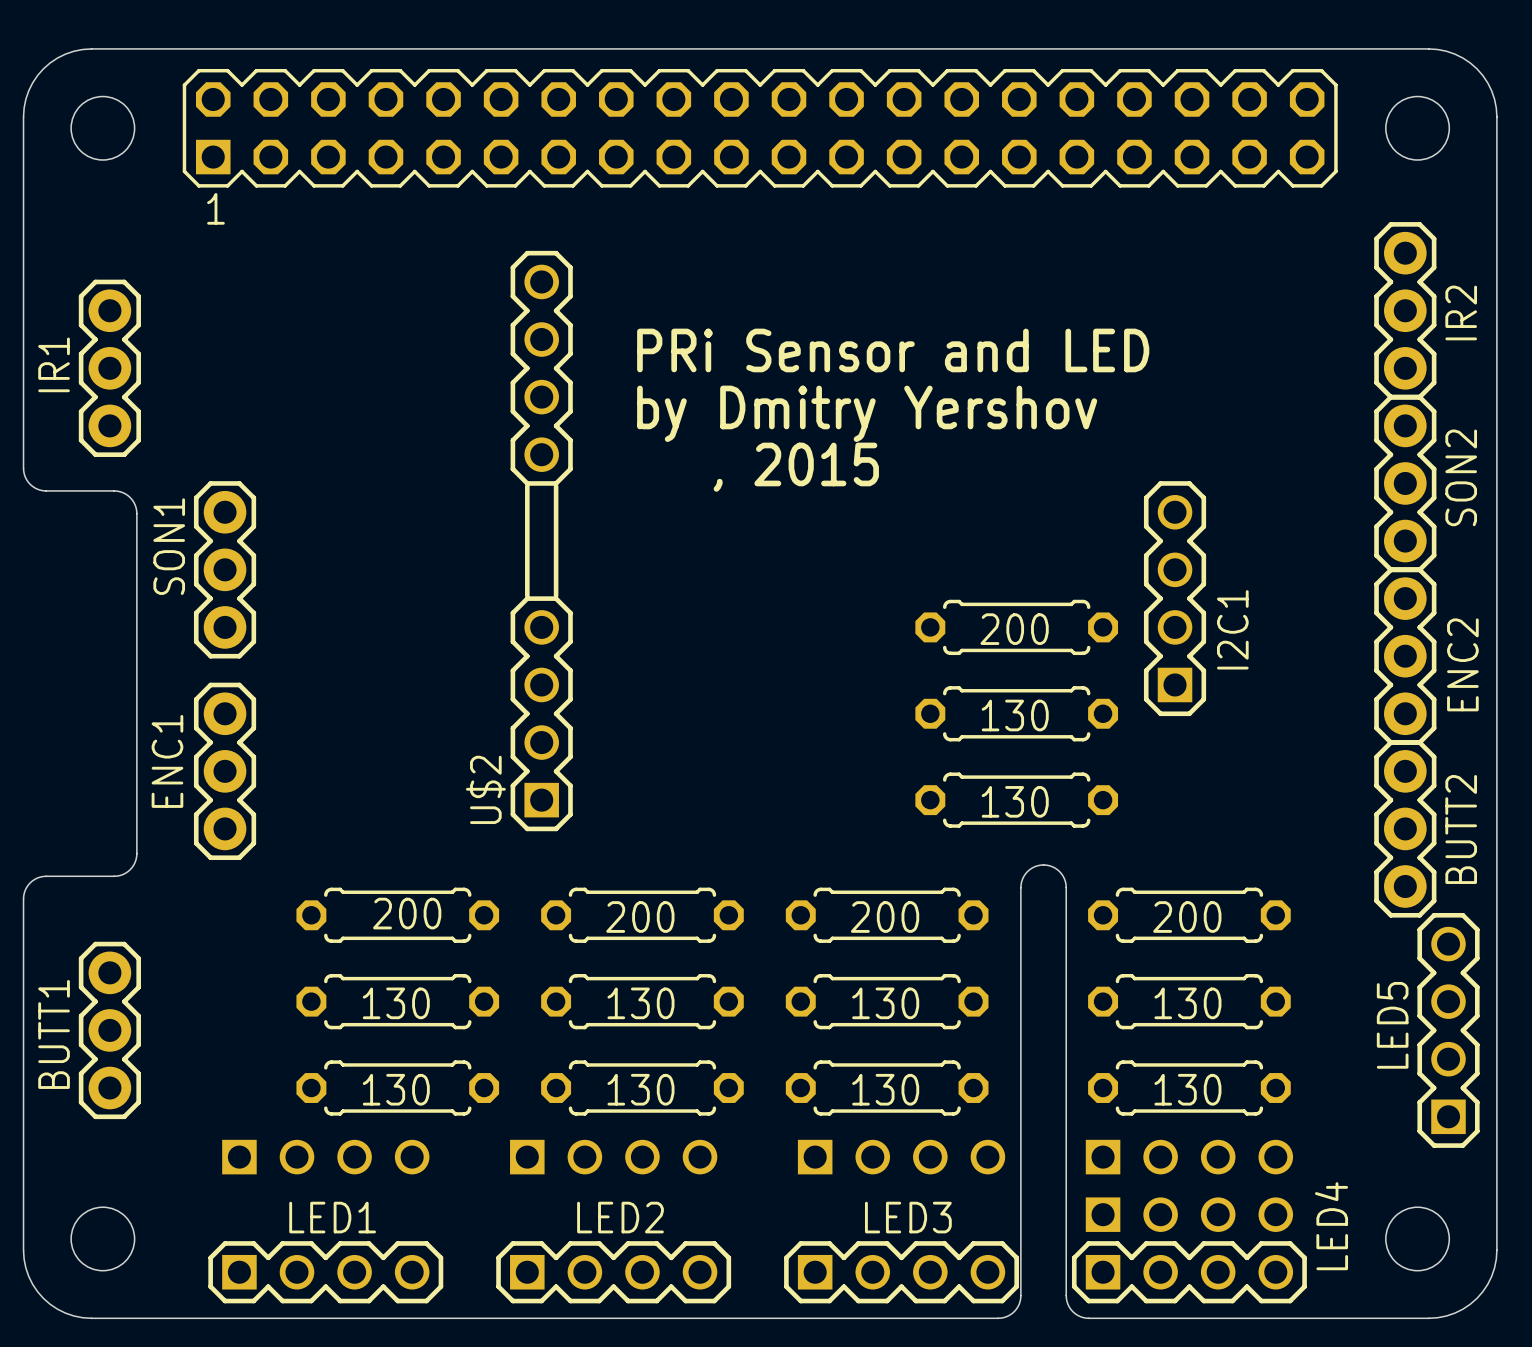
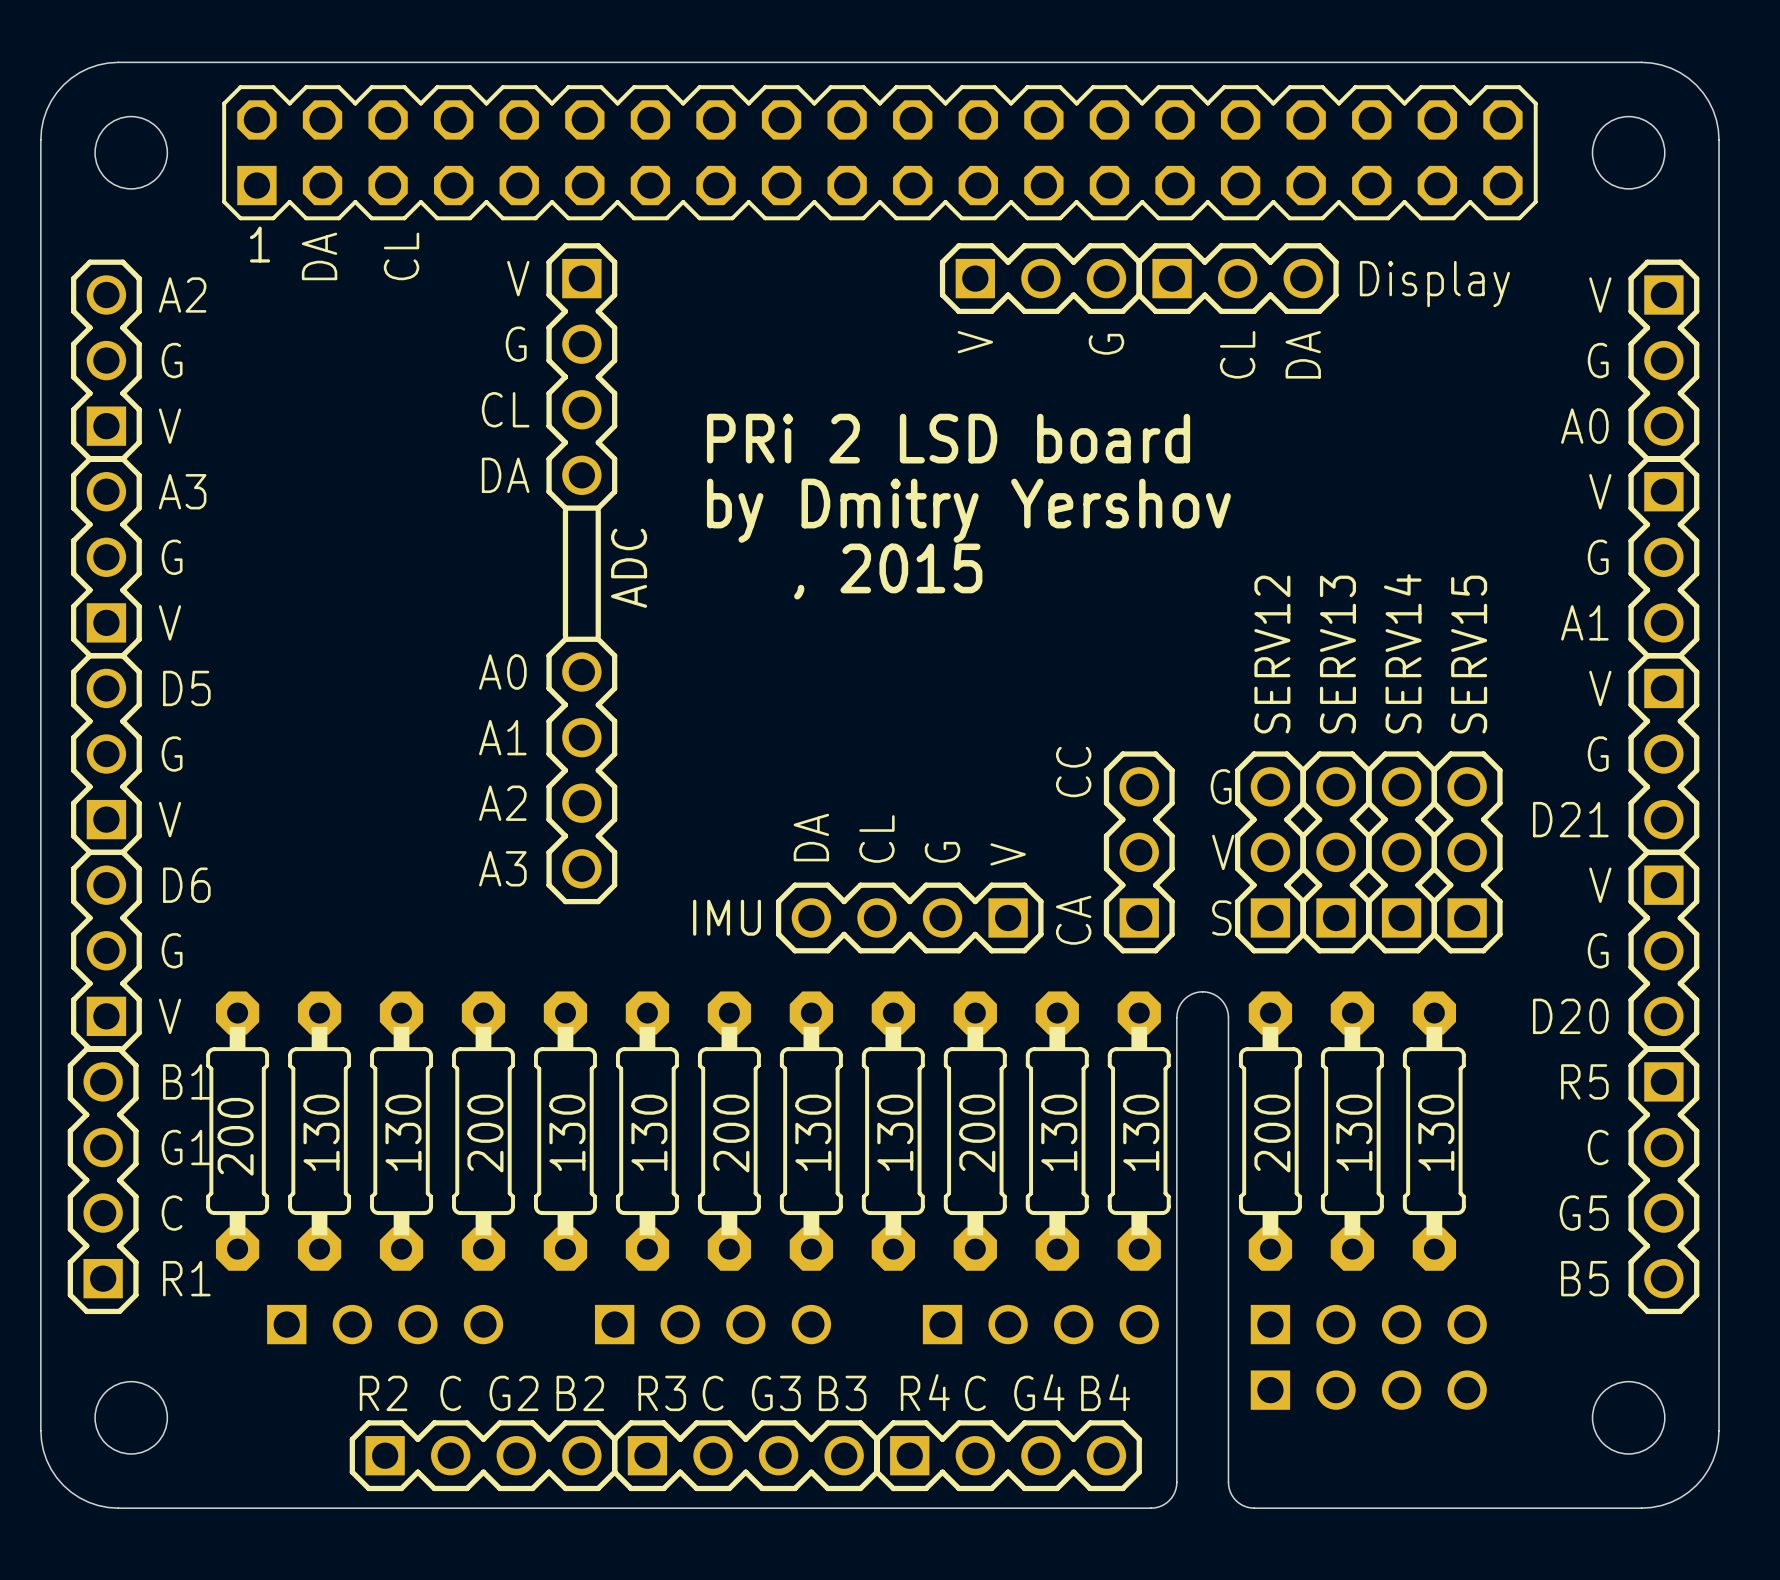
text: none -> DA (319, 256)
text: none -> CL (401, 256)
text: none -> V (518, 278)
part: none -> (1040, 278)
part: none -> (1237, 278)
text: none -> Display (1434, 284)
text: none -> A2 (182, 294)
text: none -> V (1600, 294)
text: none -> V (975, 342)
text: none -> G (516, 344)
text: none -> G (1106, 344)
text: none -> CL (1237, 354)
text: none -> DA (1303, 354)
part: none -> (106, 360)
text: none -> G (172, 360)
text: none -> G (1598, 360)
IR2: (1405, 310) -> none
part: none -> (1663, 360)
text: PRi Sensor and LED (893, 350) -> none
text: none -> CL (505, 409)
IR1: (109, 368) -> none
text: none -> V (169, 426)
text: none -> A0 (1584, 426)
text: none -> PRi 2 LSD board (948, 438)
text: none -> DA (505, 475)
text position: by Dmitry Yershov (867, 413) -> by Dmitry Yershov (968, 510)
text: none -> A3 (182, 491)
text: none -> V (1600, 491)
text position: , 2015 (796, 467) -> , 2015 (888, 571)
board edge: (23, 468) (28, 482) (37, 489) (120, 491) (132, 499) (136, 513) (136, 859) (128, 871) (117, 876) (46, 876) (37, 878) (28, 885) (23, 898) -> (40, 540) (40, 1030)
part: none -> (106, 557)
text: none -> G (172, 557)
text: none -> G (1598, 557)
SON2: (1405, 483) -> none
part: none -> (1663, 557)
ADC: none -> (581, 573)
text: none -> V (169, 622)
U$2: (541, 541) -> none
text: none -> A1 (1584, 622)
SON1: (225, 569) -> none
text: none -> A0 (502, 672)
text: none -> D5 (186, 688)
I2C1: (1175, 598) -> none
text: none -> V (1600, 688)
part: 200 (1016, 627) -> none
text: none -> A1 (502, 737)
part: none -> (106, 754)
text: none -> G (172, 754)
text: none -> G (1598, 754)
ENC2: (1405, 656) -> none
part: none -> (1663, 754)
text: none -> CC (1073, 771)
text: none -> G (1221, 786)
text: none -> A2 (502, 803)
text: none -> V (169, 819)
part: 130 (1016, 713) -> none
text: none -> D21 (1570, 819)
text: none -> DA (811, 837)
text: none -> CL (876, 838)
text: none -> G (942, 852)
part: none -> (1139, 852)
text: none -> V (1223, 852)
SERV12: none -> (1270, 852)
SERV13: none -> (1336, 852)
SERV14: none -> (1401, 852)
SERV15: none -> (1467, 852)
text: none -> V (1008, 854)
text: none -> A3 (502, 868)
text: none -> D6 (186, 885)
ENC1: (225, 771) -> none
text: none -> V (1600, 885)
IMU: none -> (909, 917)
part: 130 (1016, 800) -> none
text: none -> S (1221, 917)
text: none -> CA (1073, 920)
part: none -> (106, 950)
text: none -> G (172, 950)
text: none -> G (1598, 950)
BUTT2: (1405, 828) -> none
part: none -> (1663, 950)
text: none -> V (169, 1016)
text: none -> D20 (1570, 1016)
part: 200 (397, 915) -> none
part: 200 (642, 915) -> none
part: 200 (887, 915) -> none
part: 200 (1189, 915) -> none
text: none -> B1 (186, 1081)
text: none -> R5 (1584, 1081)
part footprint: [296, 974, 500, 1030] -> [452, 991, 515, 1271]
part footprint: [541, 974, 744, 1030] -> [697, 991, 761, 1271]
part footprint: [1088, 974, 1291, 1030] -> [1320, 991, 1384, 1271]
part: none -> 200 (237, 1131)
part: none -> 130 (319, 1131)
part: none -> 130 (401, 1131)
part: none -> 130 (565, 1131)
part: none -> 130 (647, 1131)
part: none -> 130 (811, 1131)
part: none -> 130 (893, 1131)
part: none -> 200 (975, 1131)
part: none -> 130 (1057, 1131)
part: none -> 130 (1139, 1131)
part: none -> 200 (1270, 1131)
part: none -> 130 (1434, 1131)
text: none -> G1 (186, 1147)
part: 130 (887, 1001) -> none
text: none -> C (1598, 1147)
part value: 130 (396, 1003) -> 200 (485, 1133)
part value: 130 (640, 1003) -> 200 (731, 1133)
part: none -> (103, 1180)
BUTT1: (109, 1030) -> none
LED5: (1448, 1030) -> none
part: none -> (1663, 1180)
text: none -> C (172, 1213)
text: none -> G5 (1584, 1213)
part: 130 (397, 1088) -> none
part: 130 (642, 1088) -> none
part: 130 (887, 1088) -> none
part: 130 (1189, 1088) -> none
text: none -> R1 (186, 1278)
text: none -> B5 (1584, 1278)
text: none -> R4 (925, 1392)
text: none -> G4 (1039, 1392)
text: none -> B4 (1105, 1392)
text: none -> R2 (383, 1393)
text: none -> C (450, 1393)
text: none -> G2 (514, 1393)
text: none -> B2 (580, 1393)
text: none -> R3 (662, 1393)
text: none -> C (713, 1393)
text: none -> G3 (776, 1393)
text: none -> B3 (842, 1393)
text: none -> C (975, 1393)
LED1: (325, 1272) -> none
part: none -> (483, 1455)
LED2: (613, 1272) -> none
part: none -> (745, 1455)
part: none -> (1008, 1455)
LED3: (901, 1272) -> none
LED4: (1189, 1272) -> none

